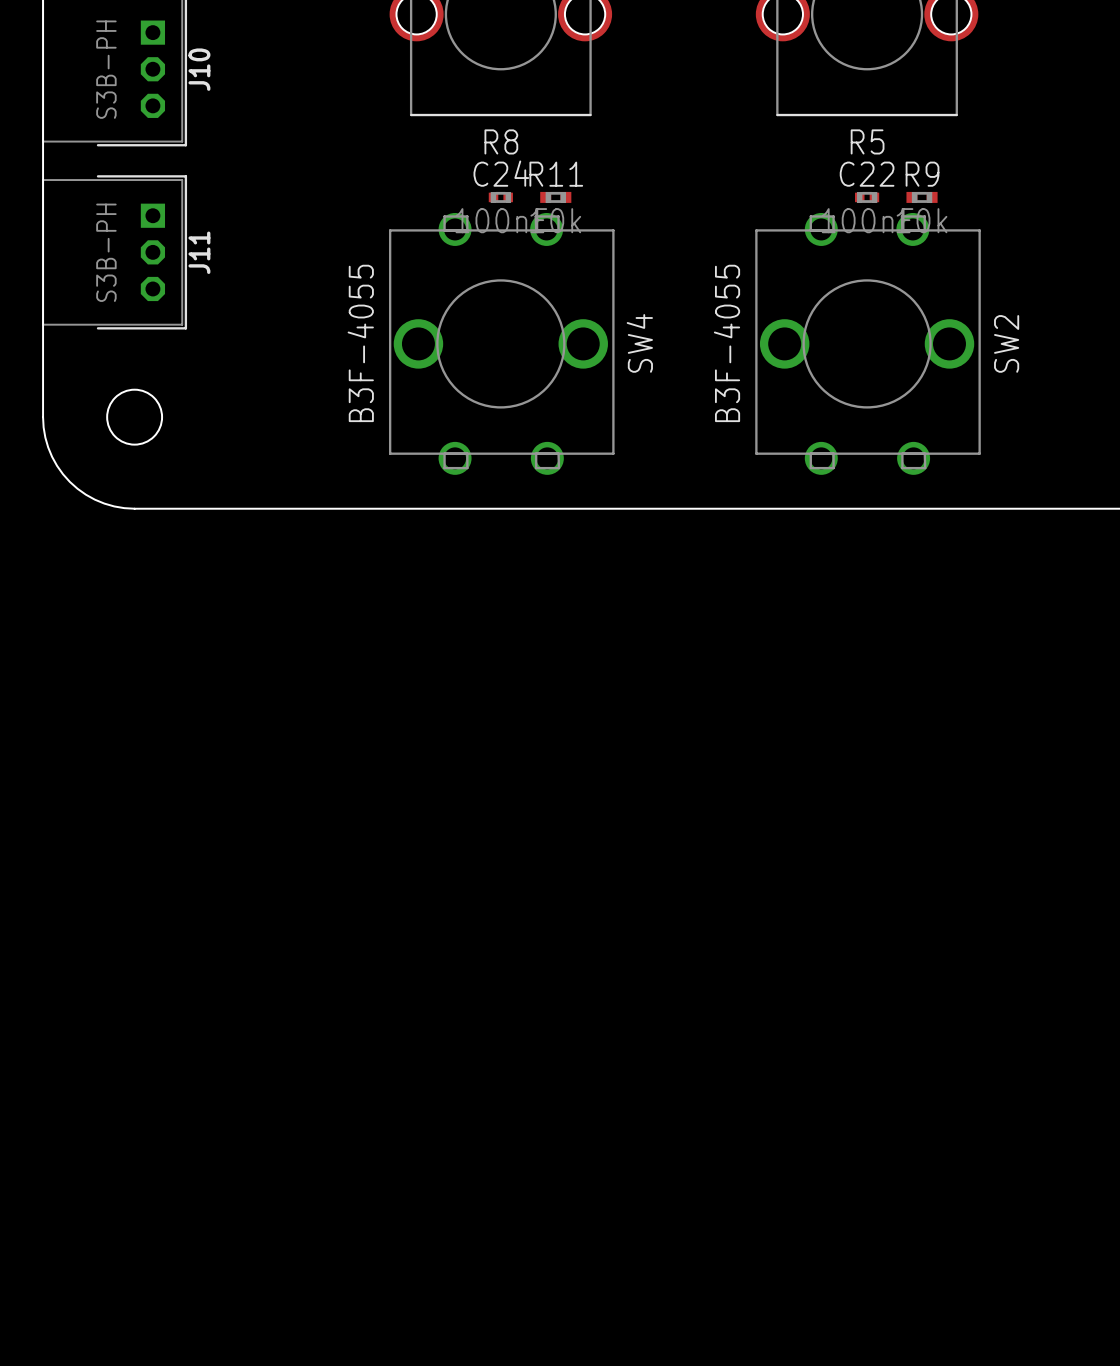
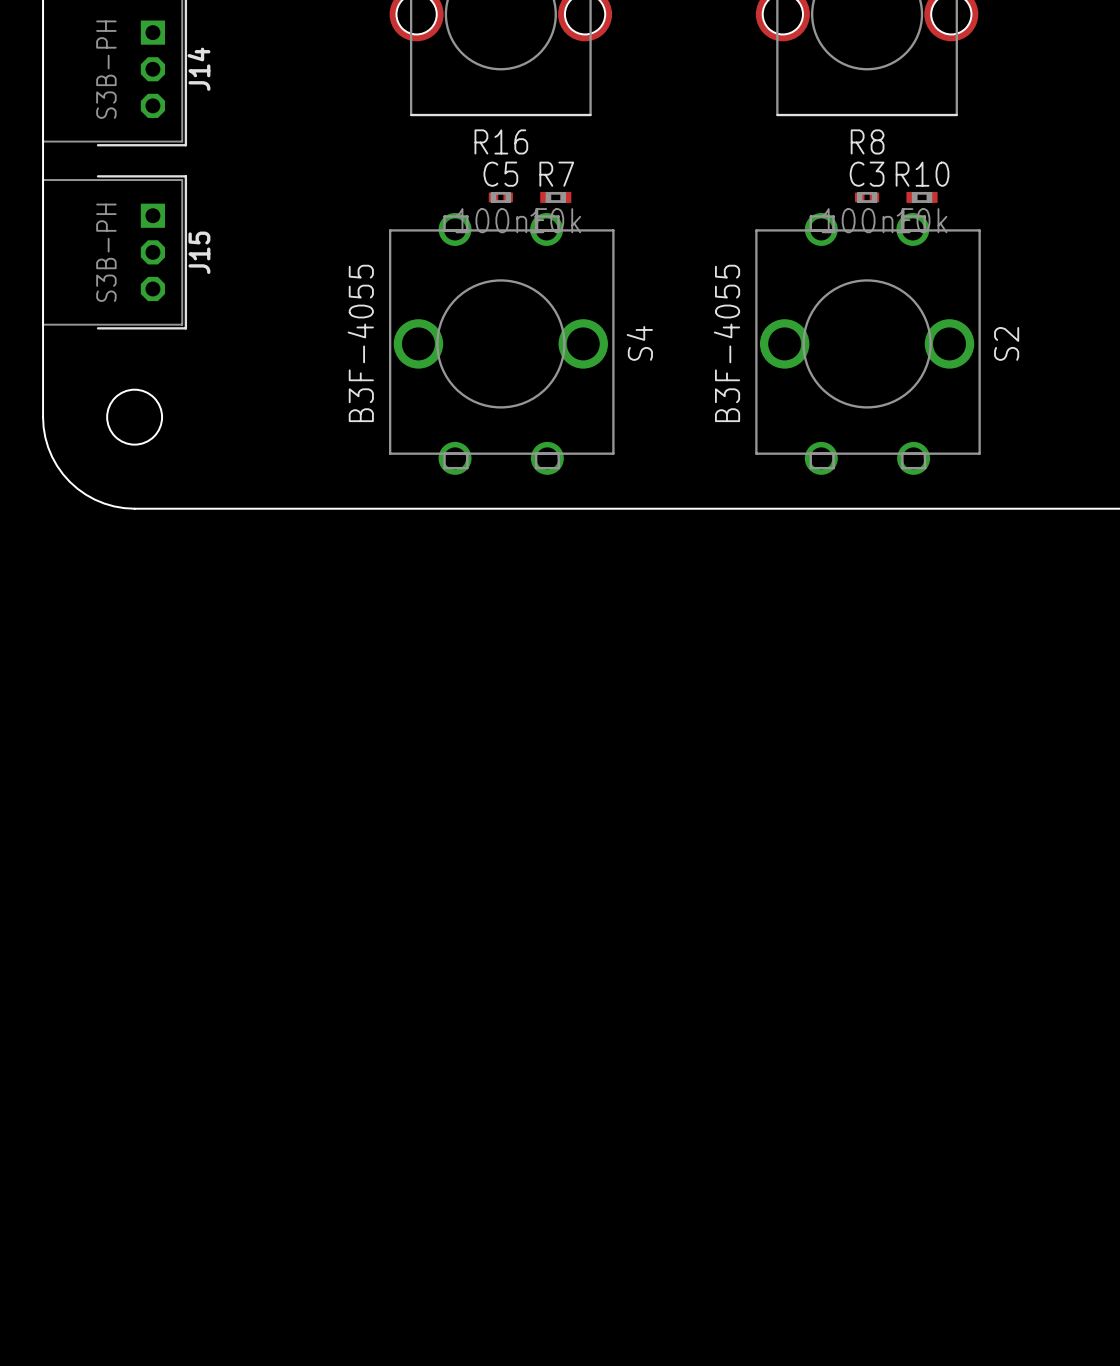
J10 name: J10 (199, 69) -> J14 (198, 69)
R8 name: R8 (501, 141) -> R16 (501, 141)
R5 name: R5 (867, 141) -> R8 (867, 141)
C24 name: C24 (501, 173) -> C5 (500, 174)
R11 name: R11 (556, 174) -> R7 (556, 174)
C22 name: C22 (867, 174) -> C3 (867, 174)
R9 name: R9 (922, 174) -> R10 (922, 174)
J11 name: J11 (199, 252) -> J15 (199, 252)
SW4 name: SW4 (639, 343) -> S4 (639, 343)
SW2 name: SW2 (1006, 343) -> S2 (1006, 343)

